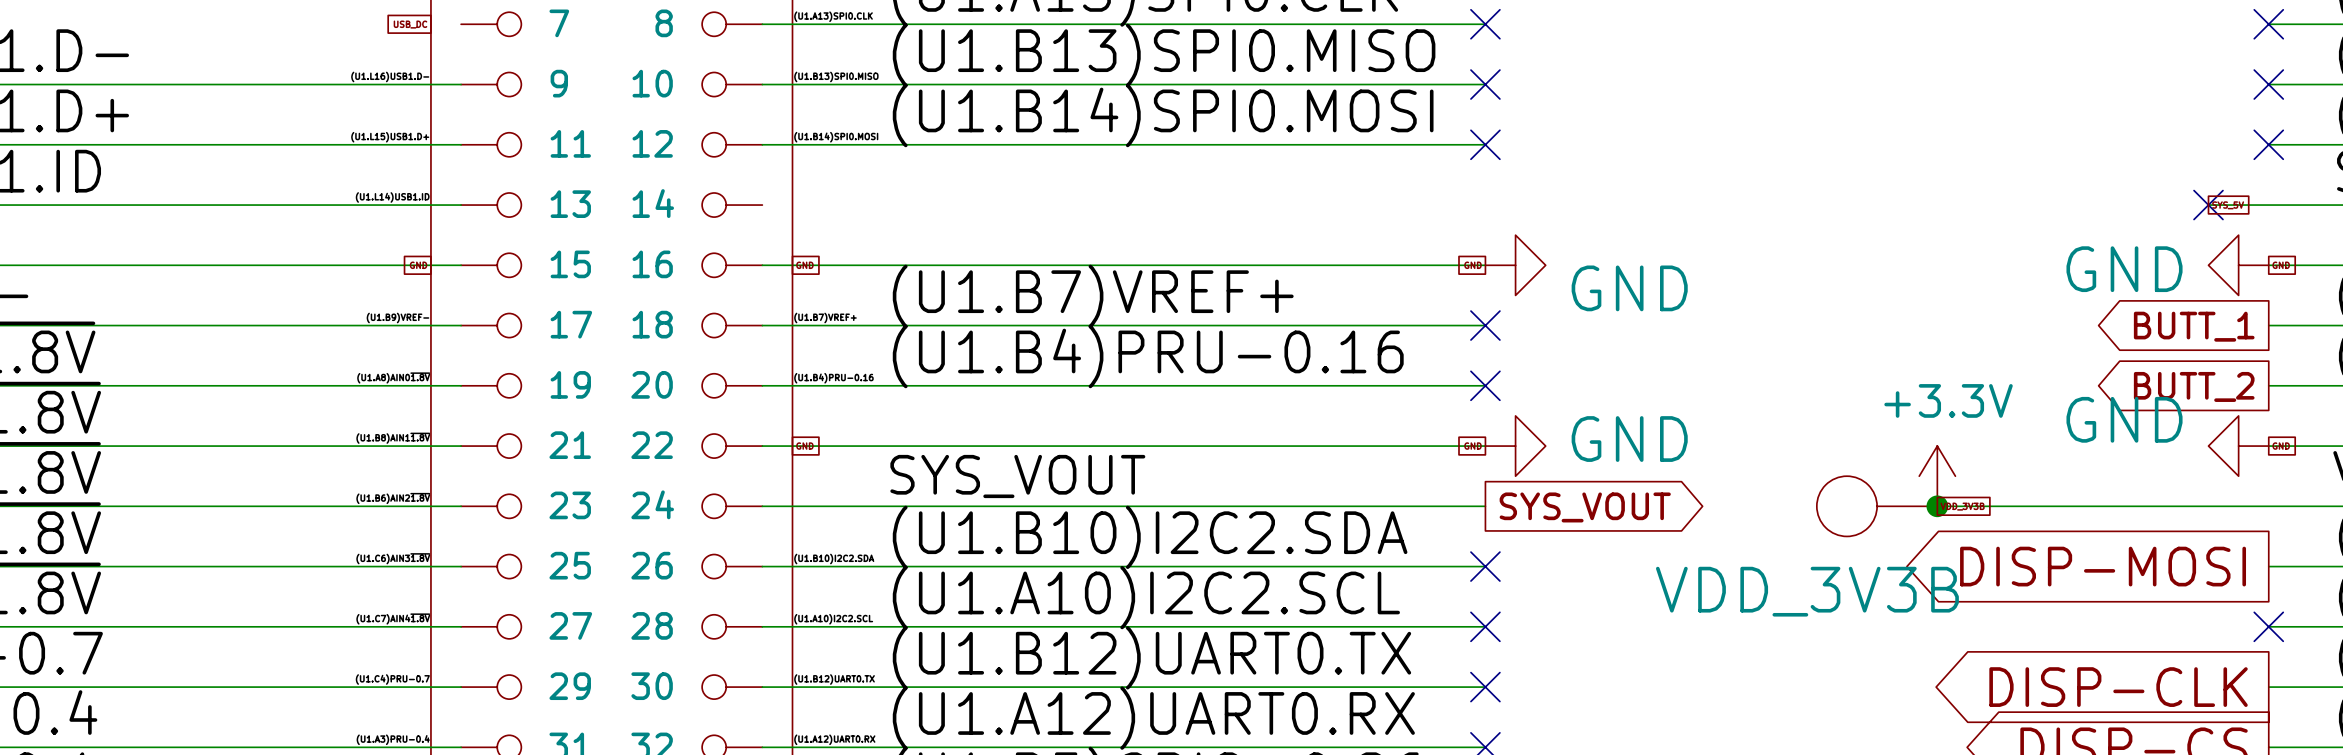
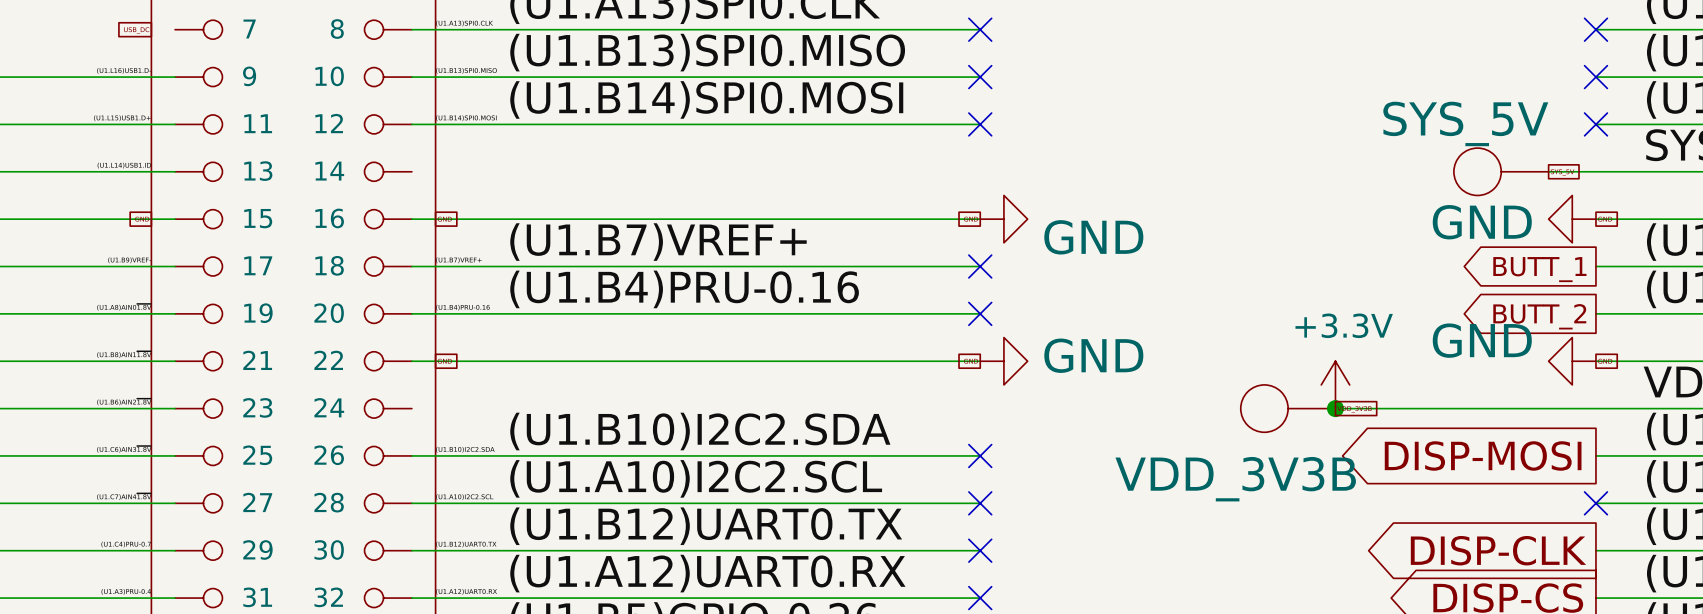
power symbol: none -> SYS_5V (1501, 171)
no-connect mark: (2208, 205) -> none
label: SYS_VOUT (1017, 476) -> none
wire: (762, 506) (1485, 506) -> none
global label: SYS_VOUT (1585, 507) -> none

